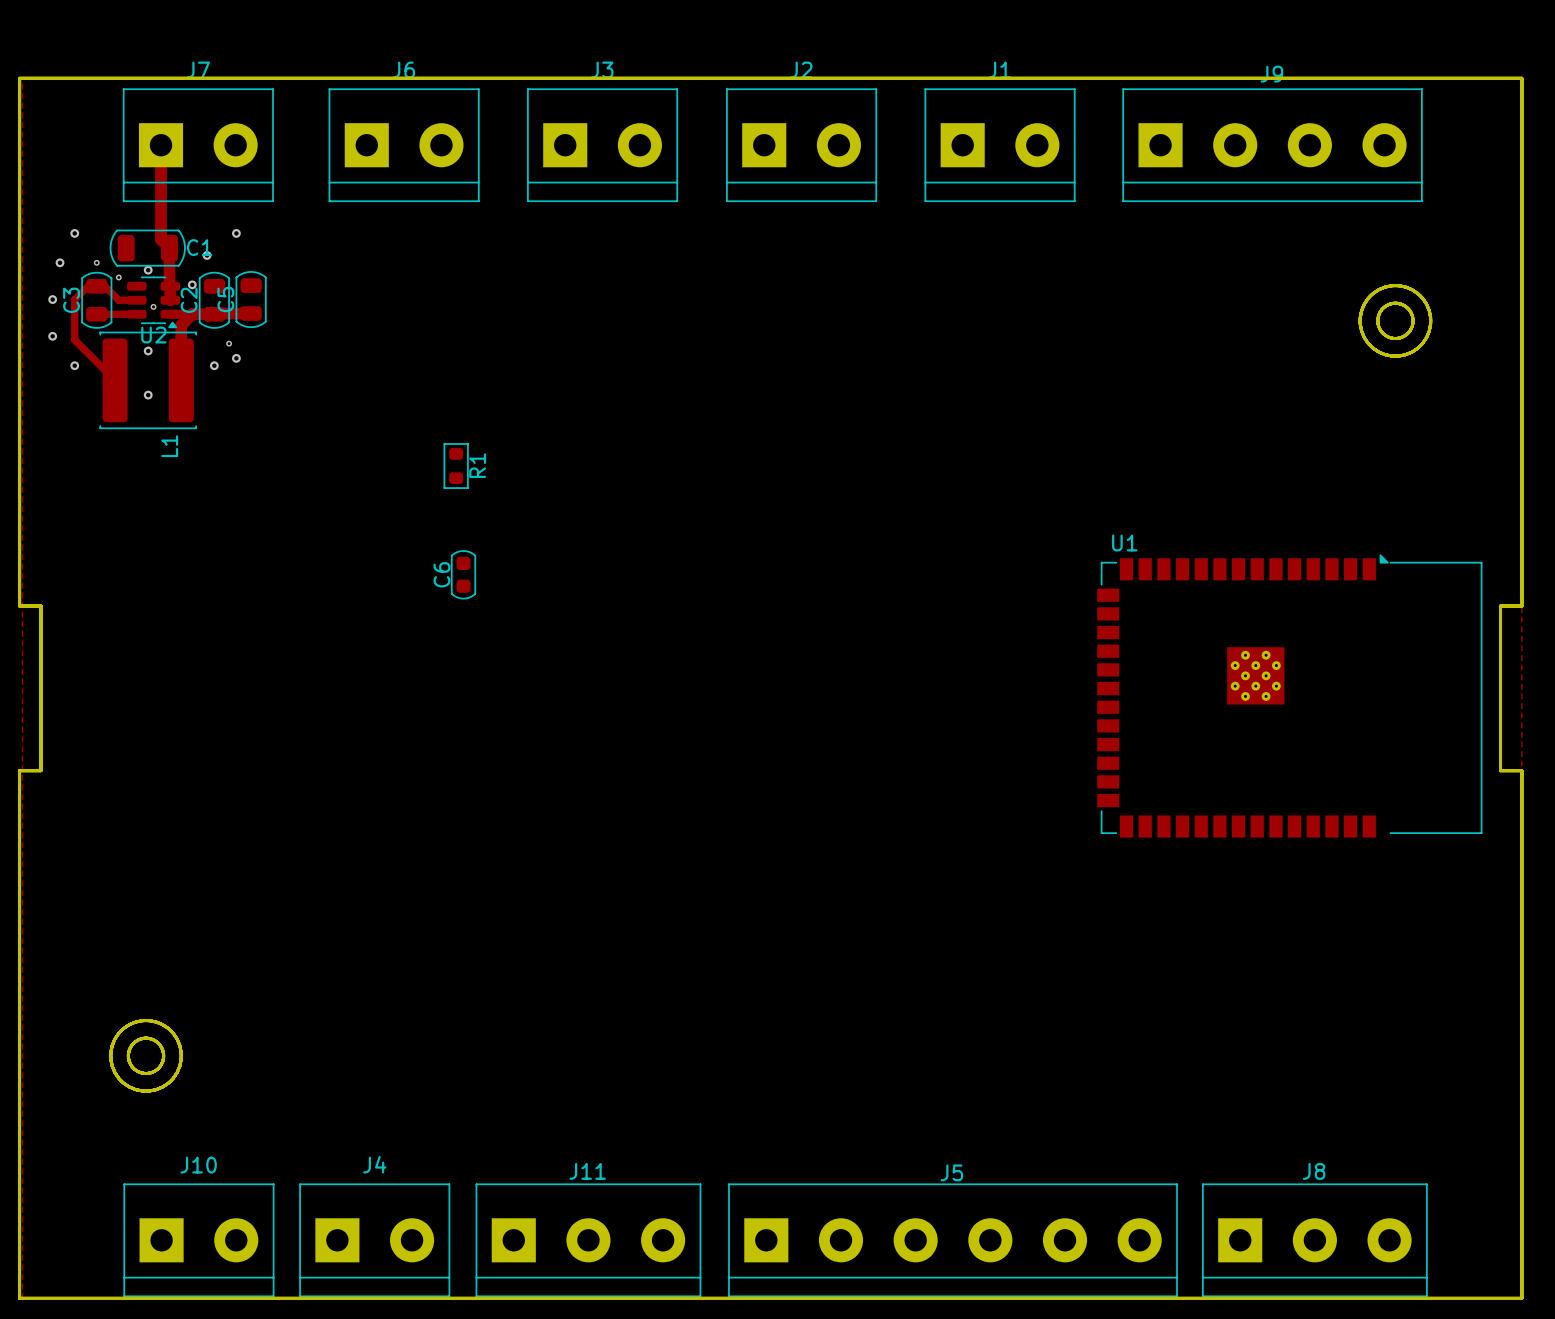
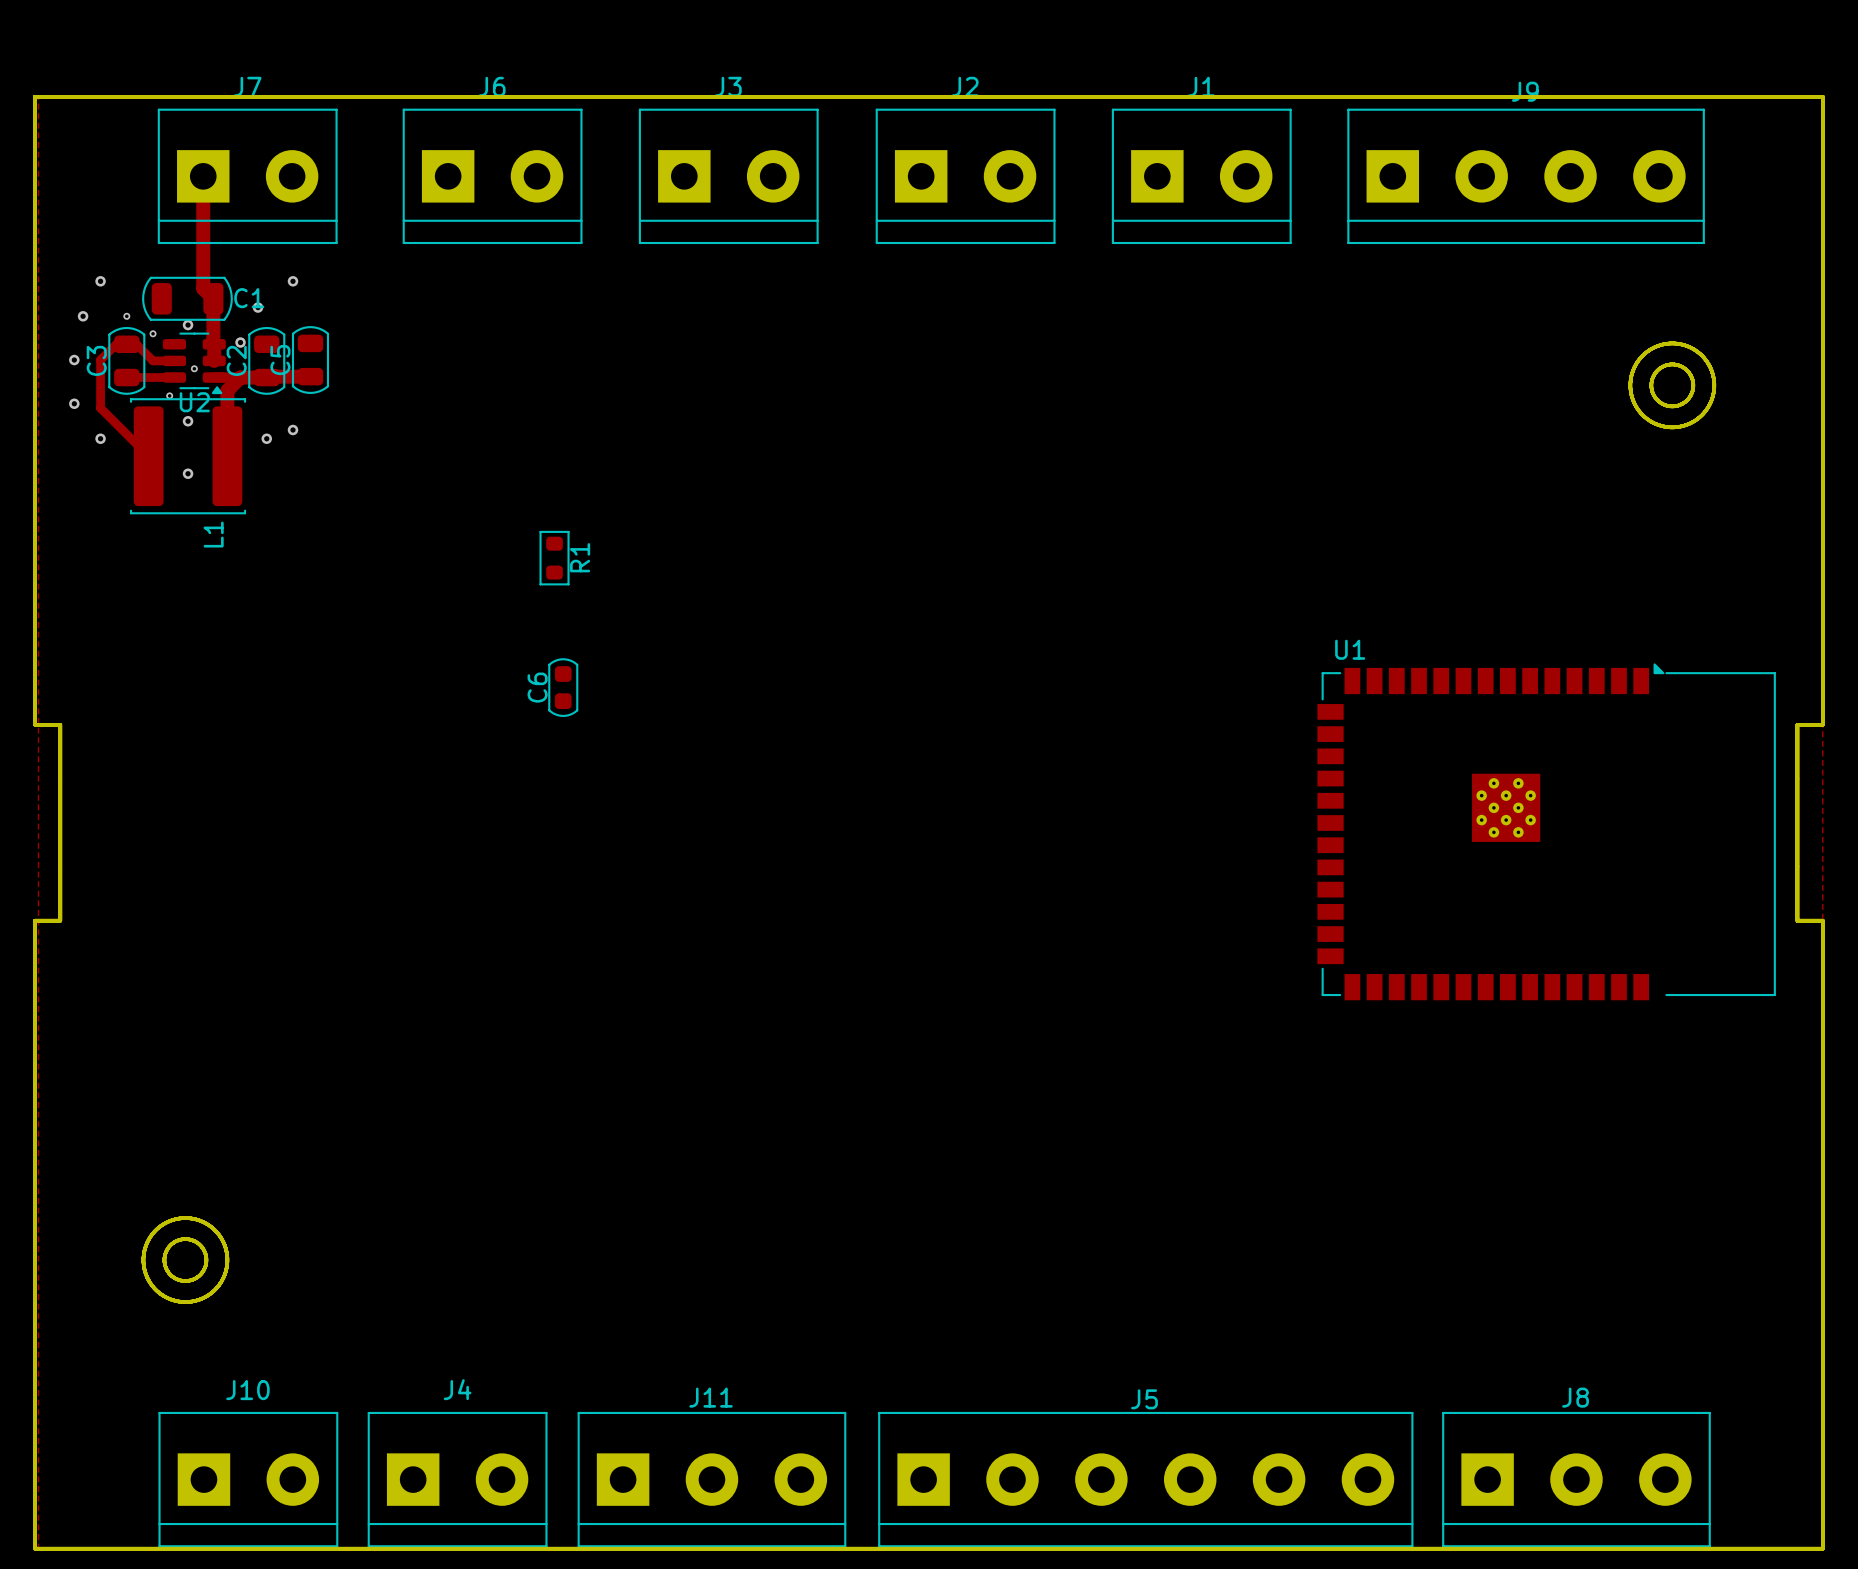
via: none -> (169, 395)
via: (229, 343) -> none

